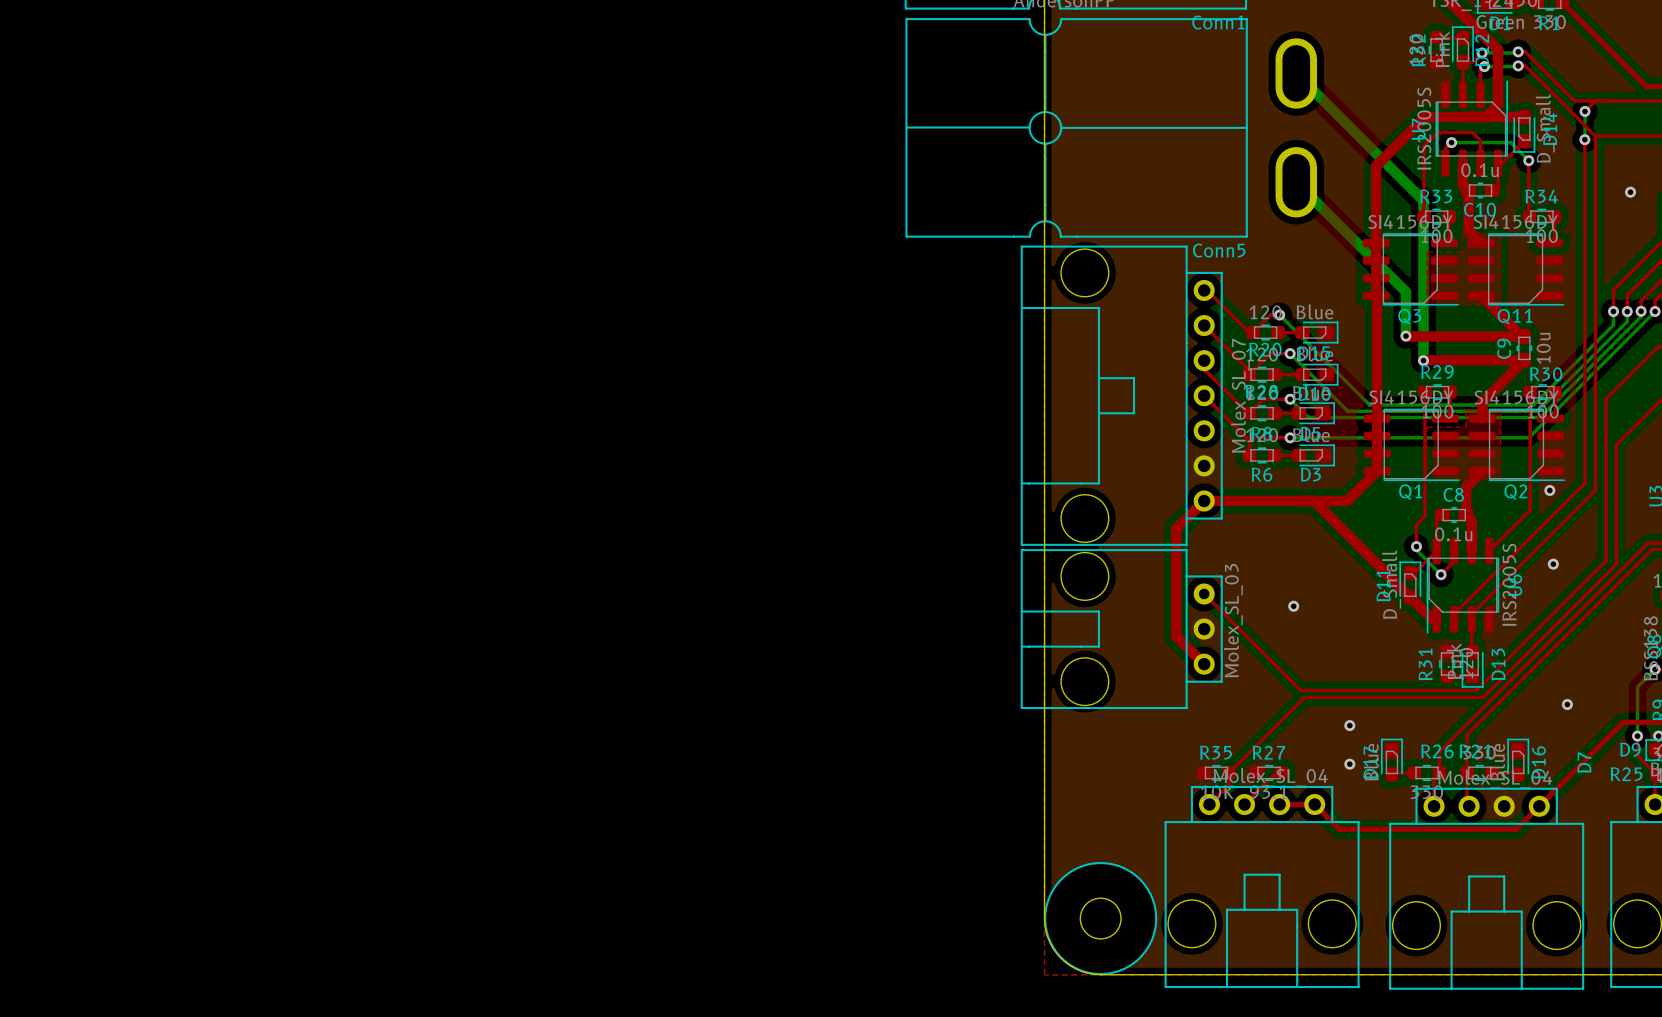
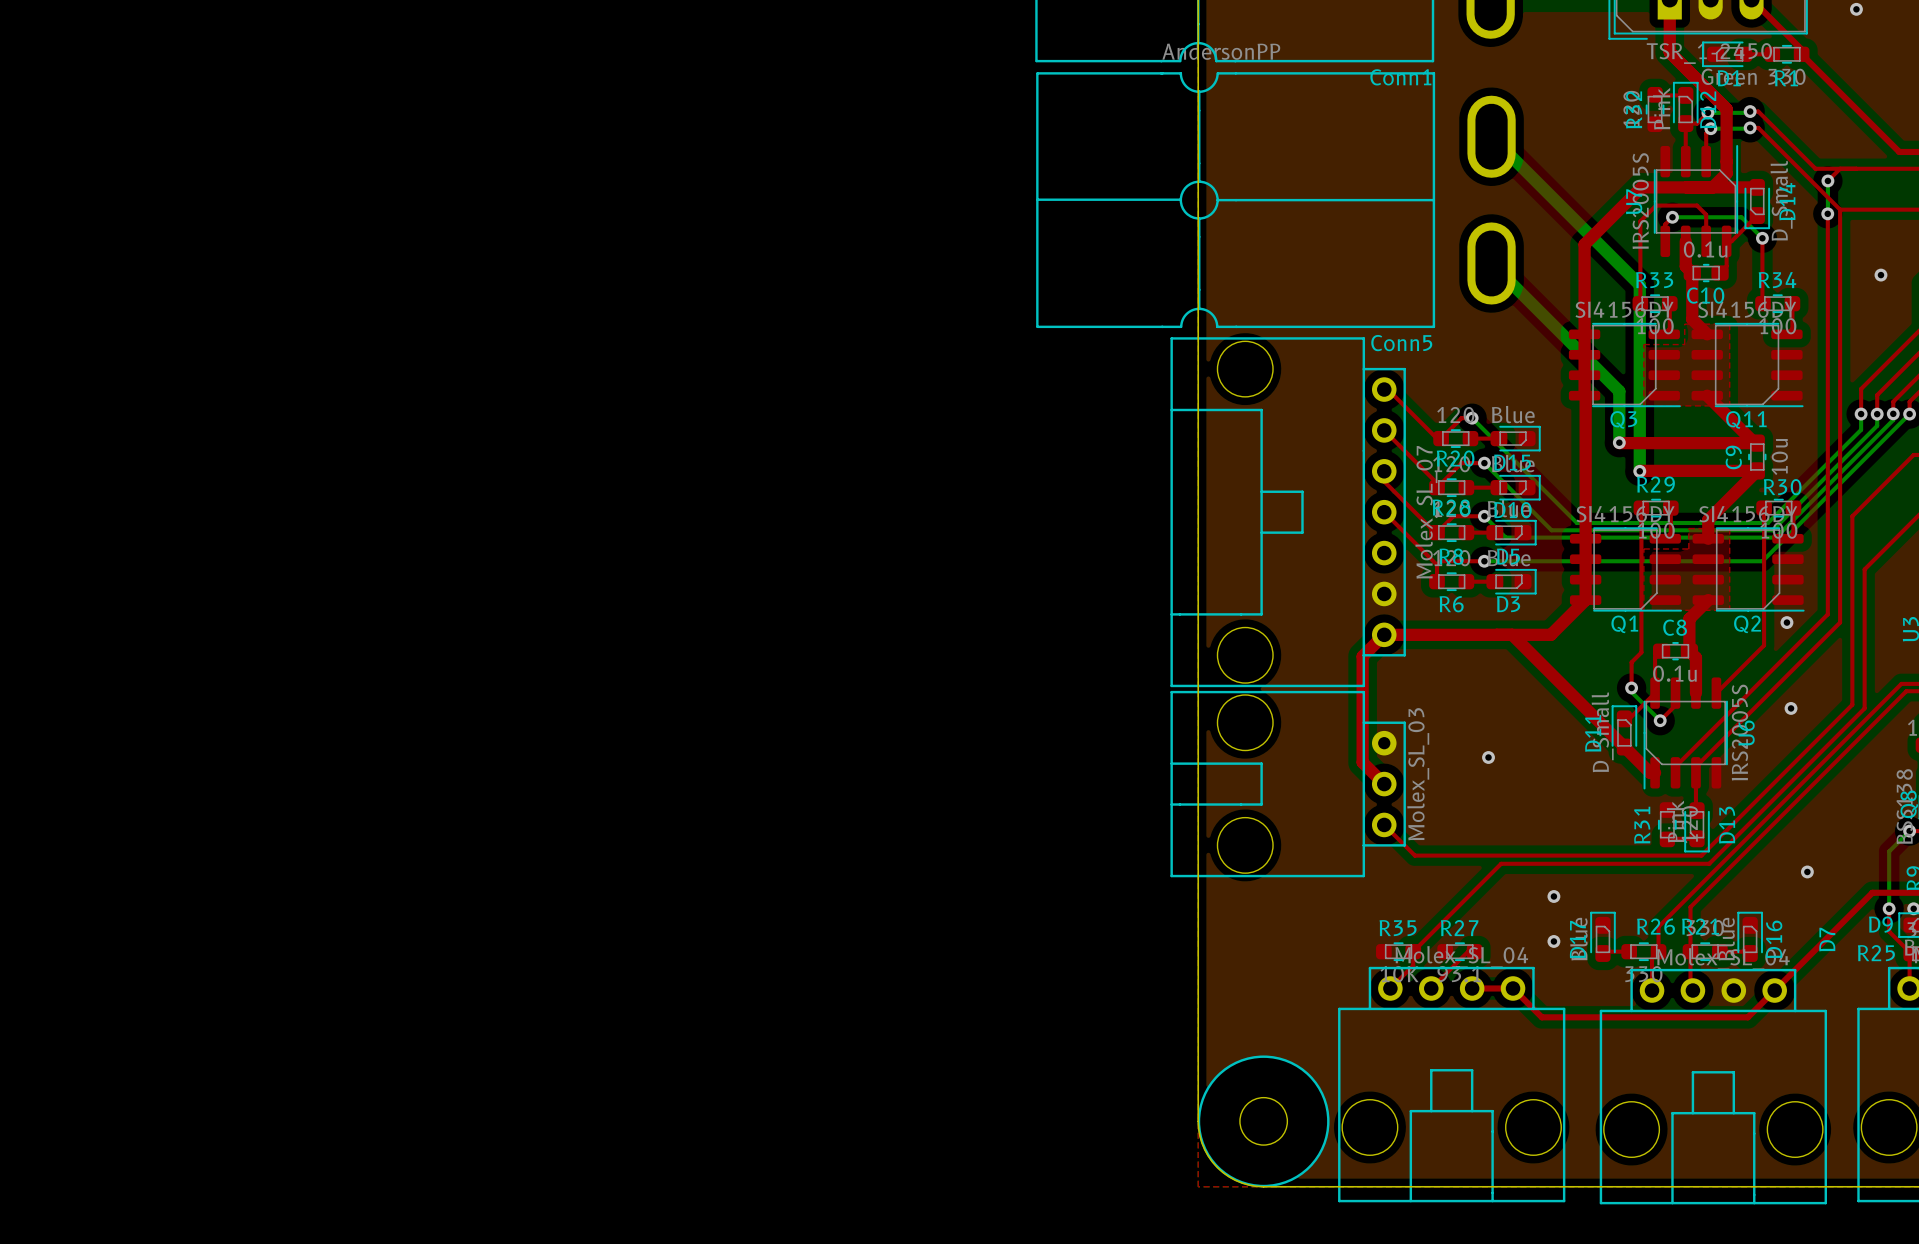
top track: (1185, 519) (1176, 528) (1176, 636) (1204, 664) -> (1362, 656) (1362, 762) (1384, 784)
top track: (1204, 593) (1300, 690) -> (1384, 824) (1414, 855) (1496, 855)

